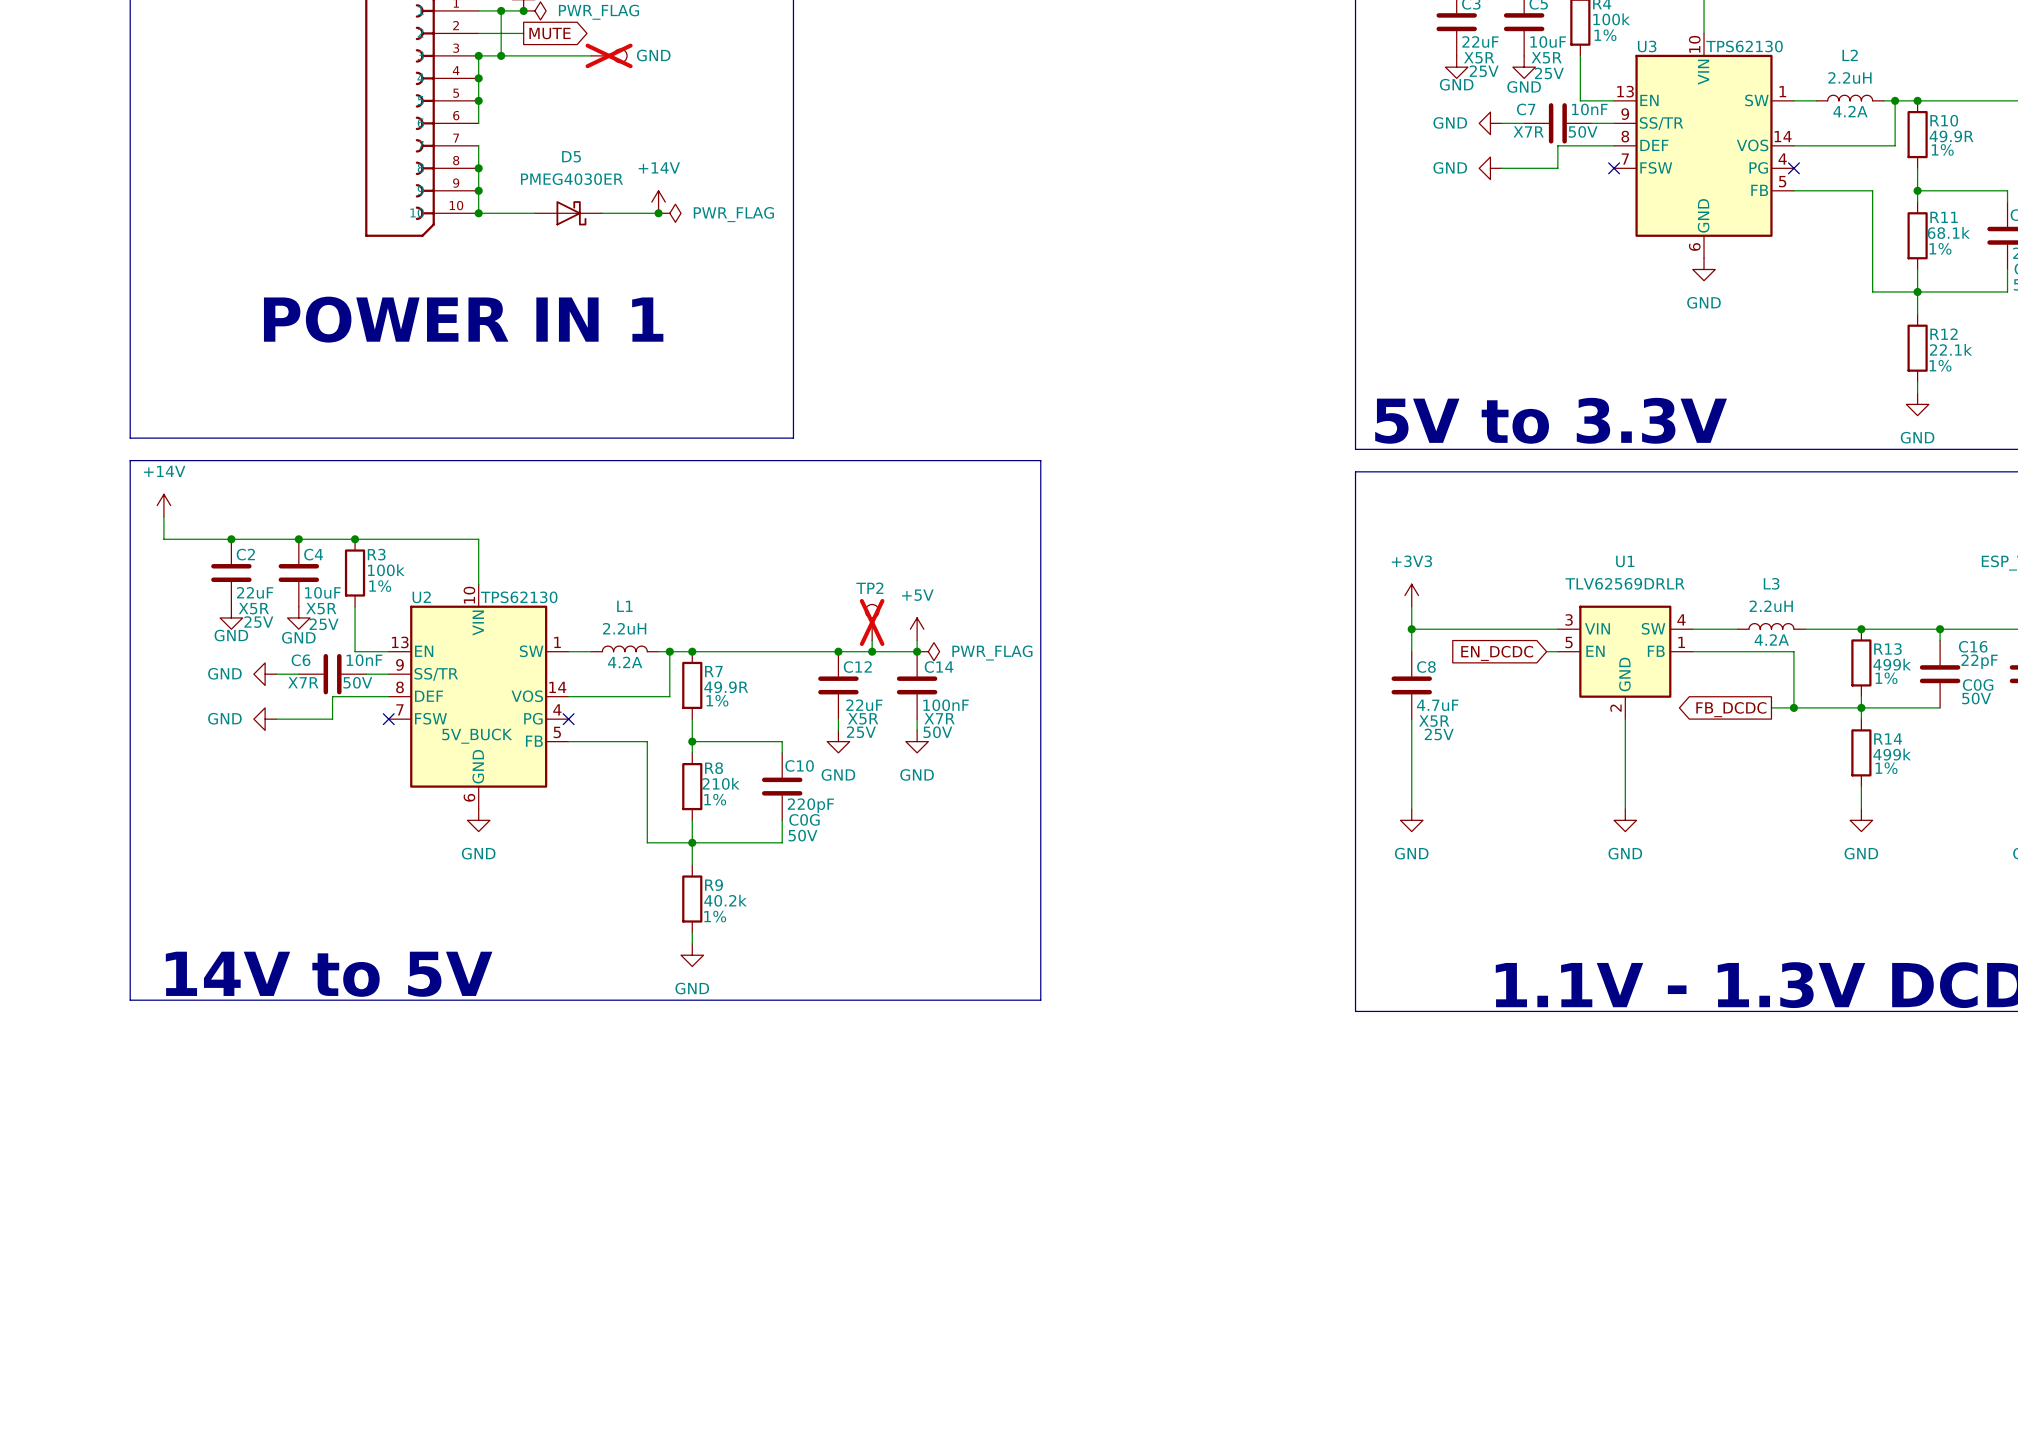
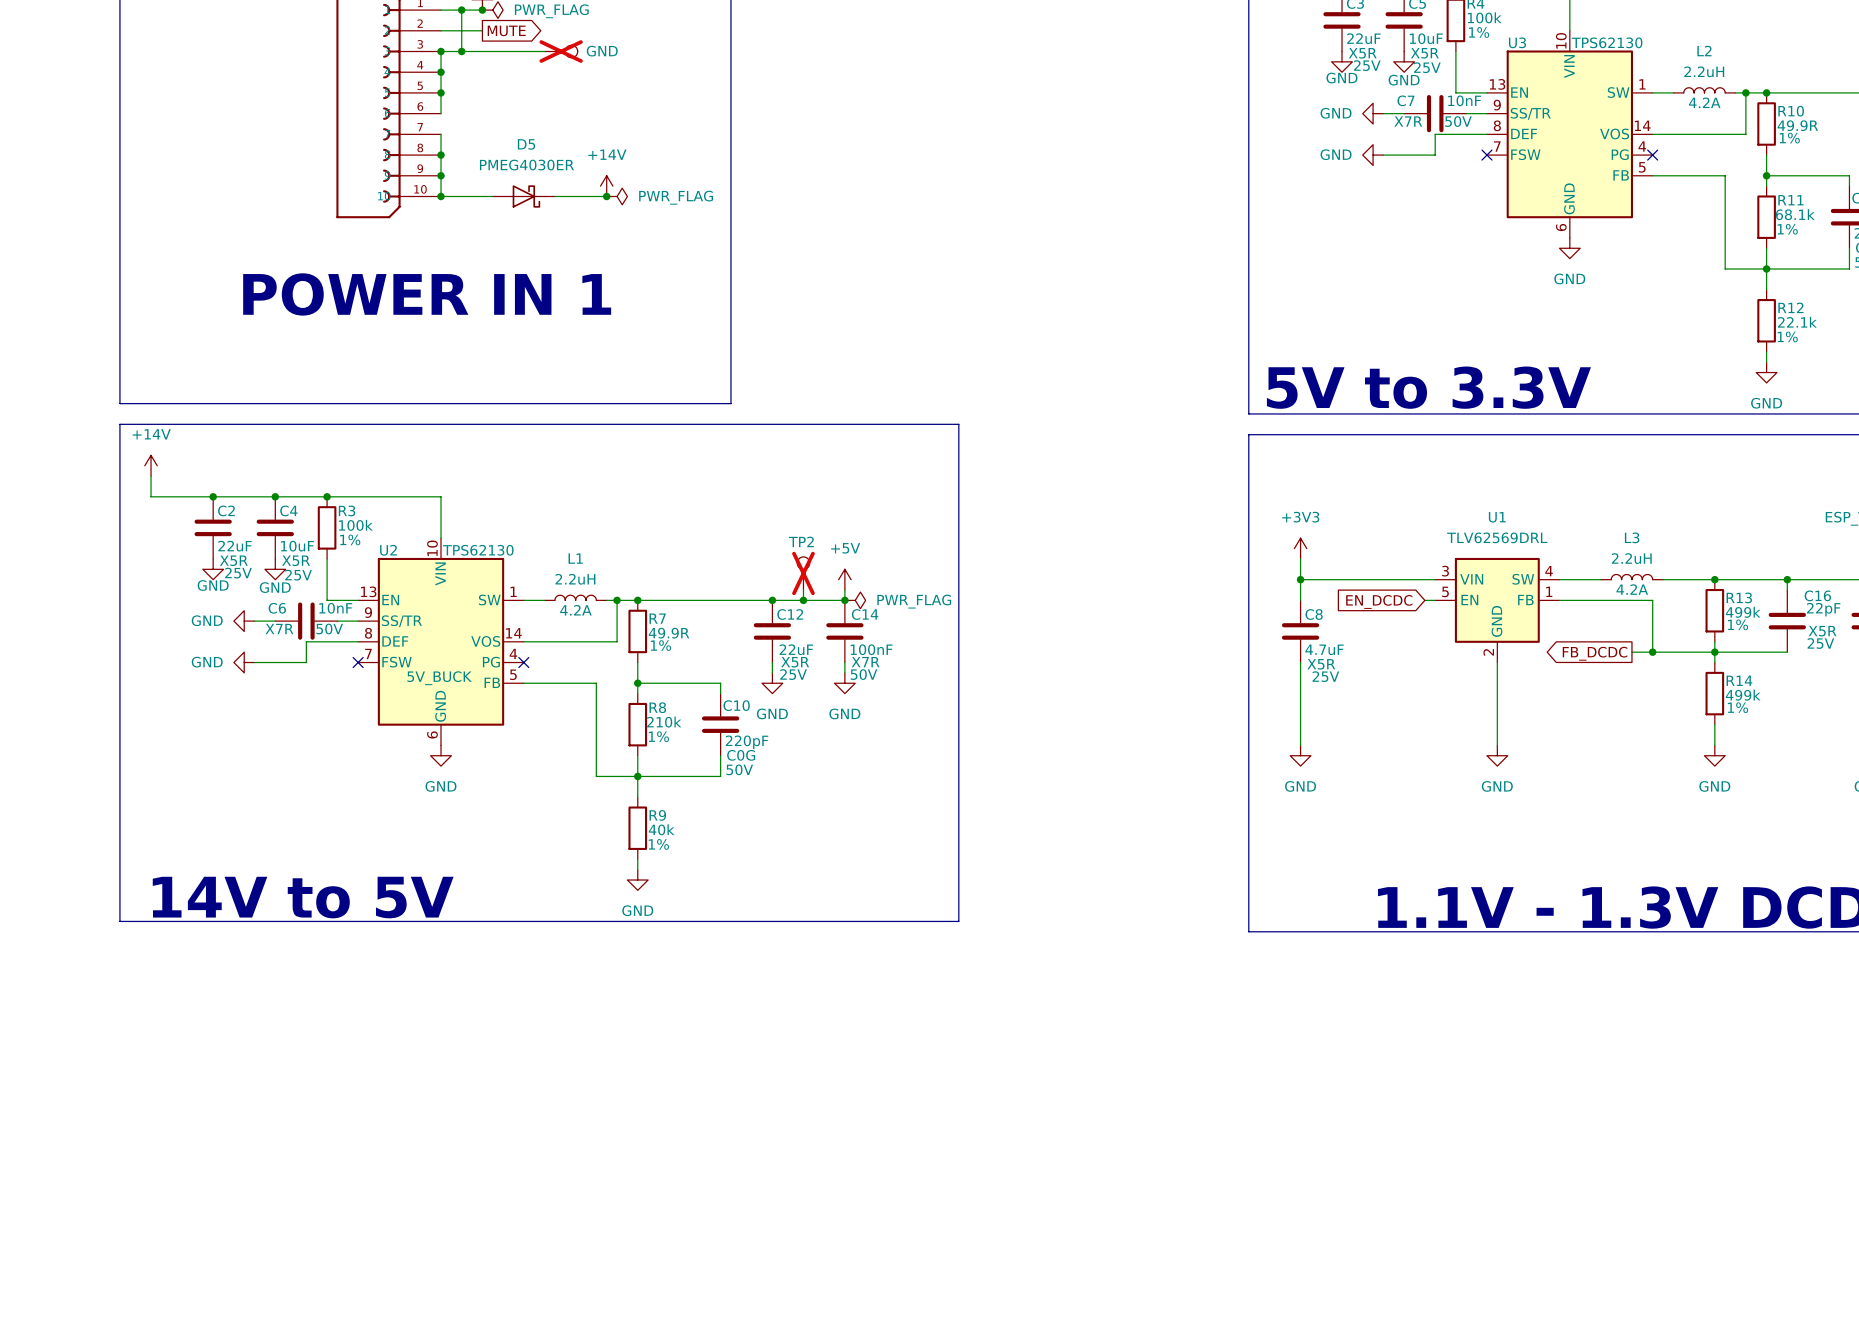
U1 value: TLV62569DRLR (1625, 583) -> TLV62569DRL (1497, 537)
C16 text: C0G (1978, 685) -> X5R (1822, 631)
C16 text: 50V (1976, 698) -> 25V (1820, 643)
R9 value: 40.2k (725, 900) -> 40k (661, 829)

